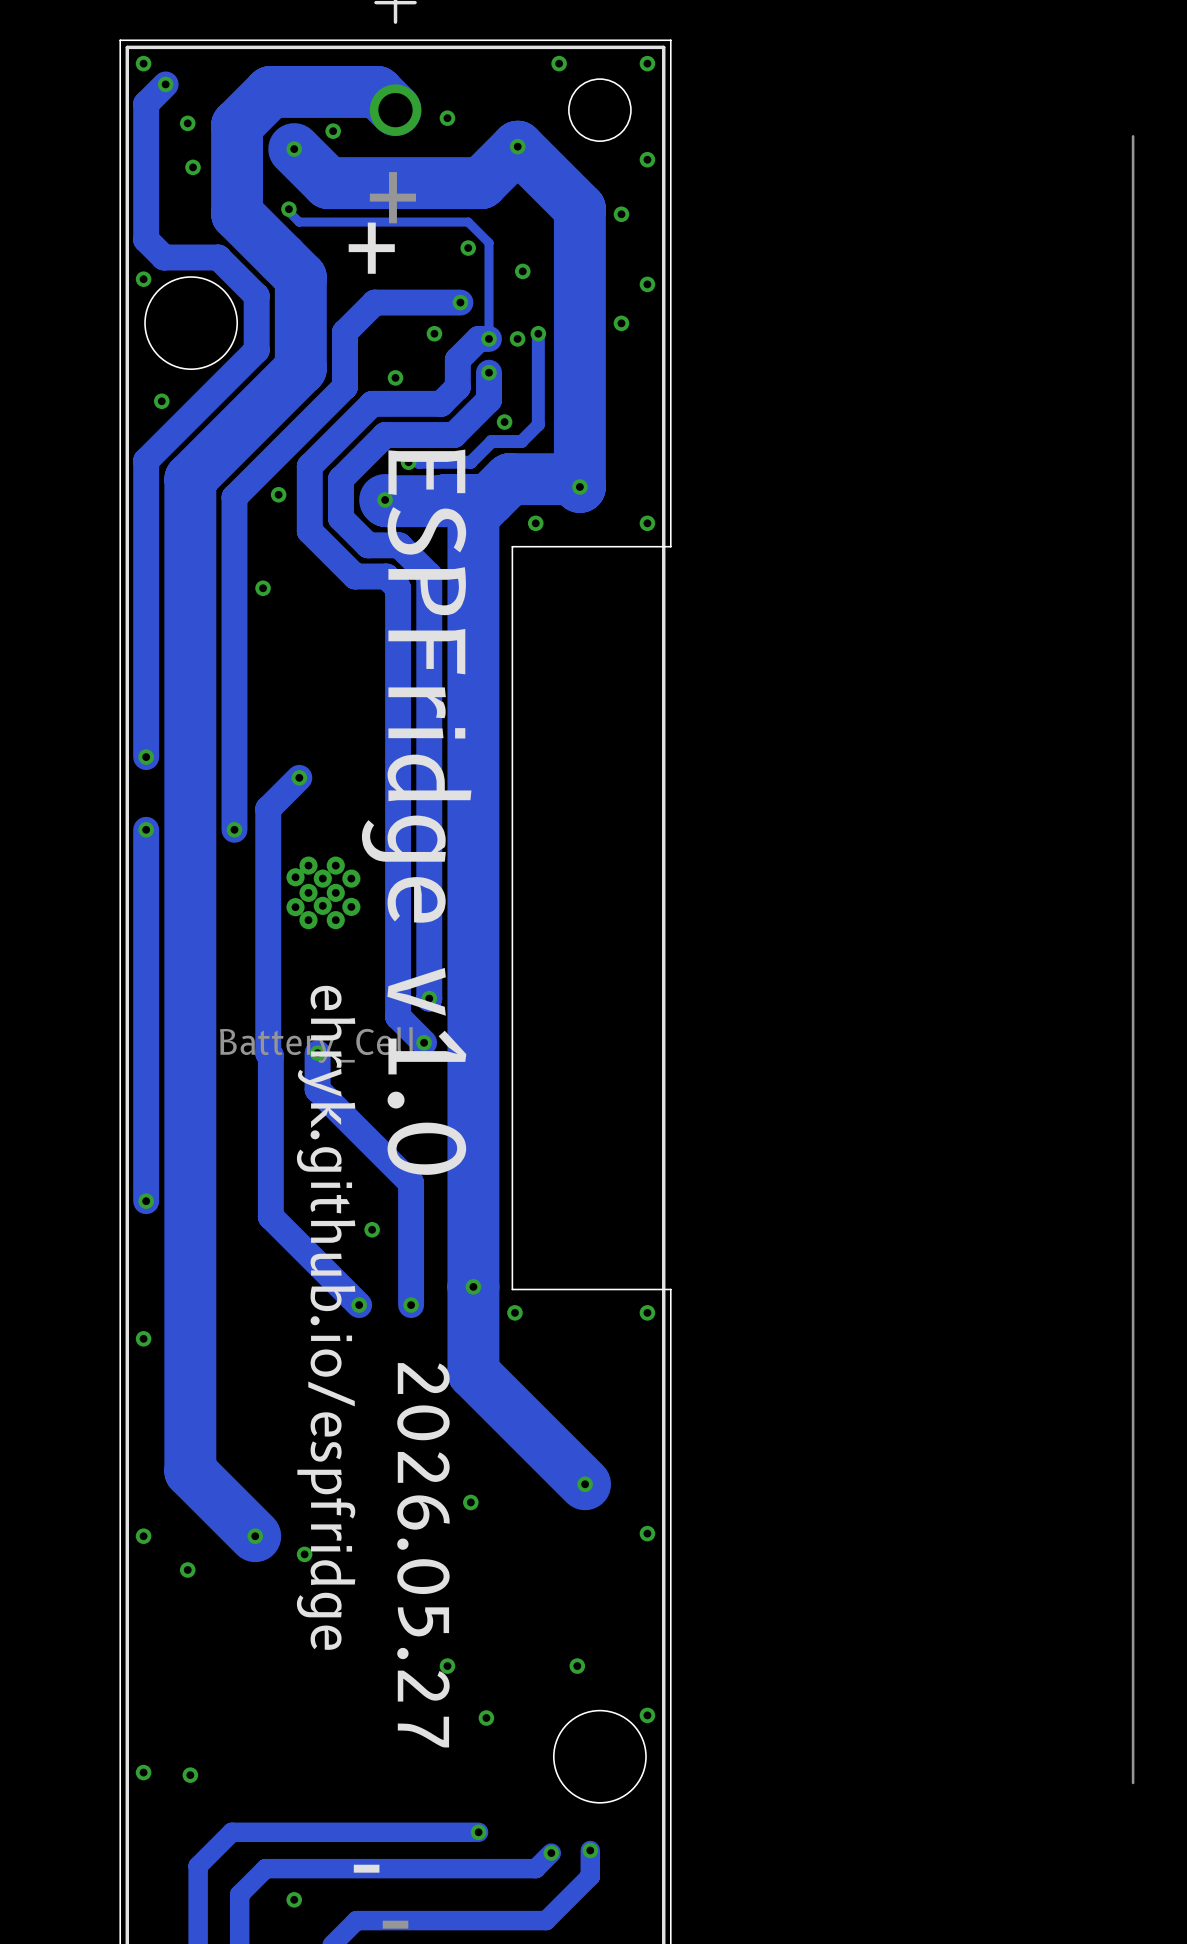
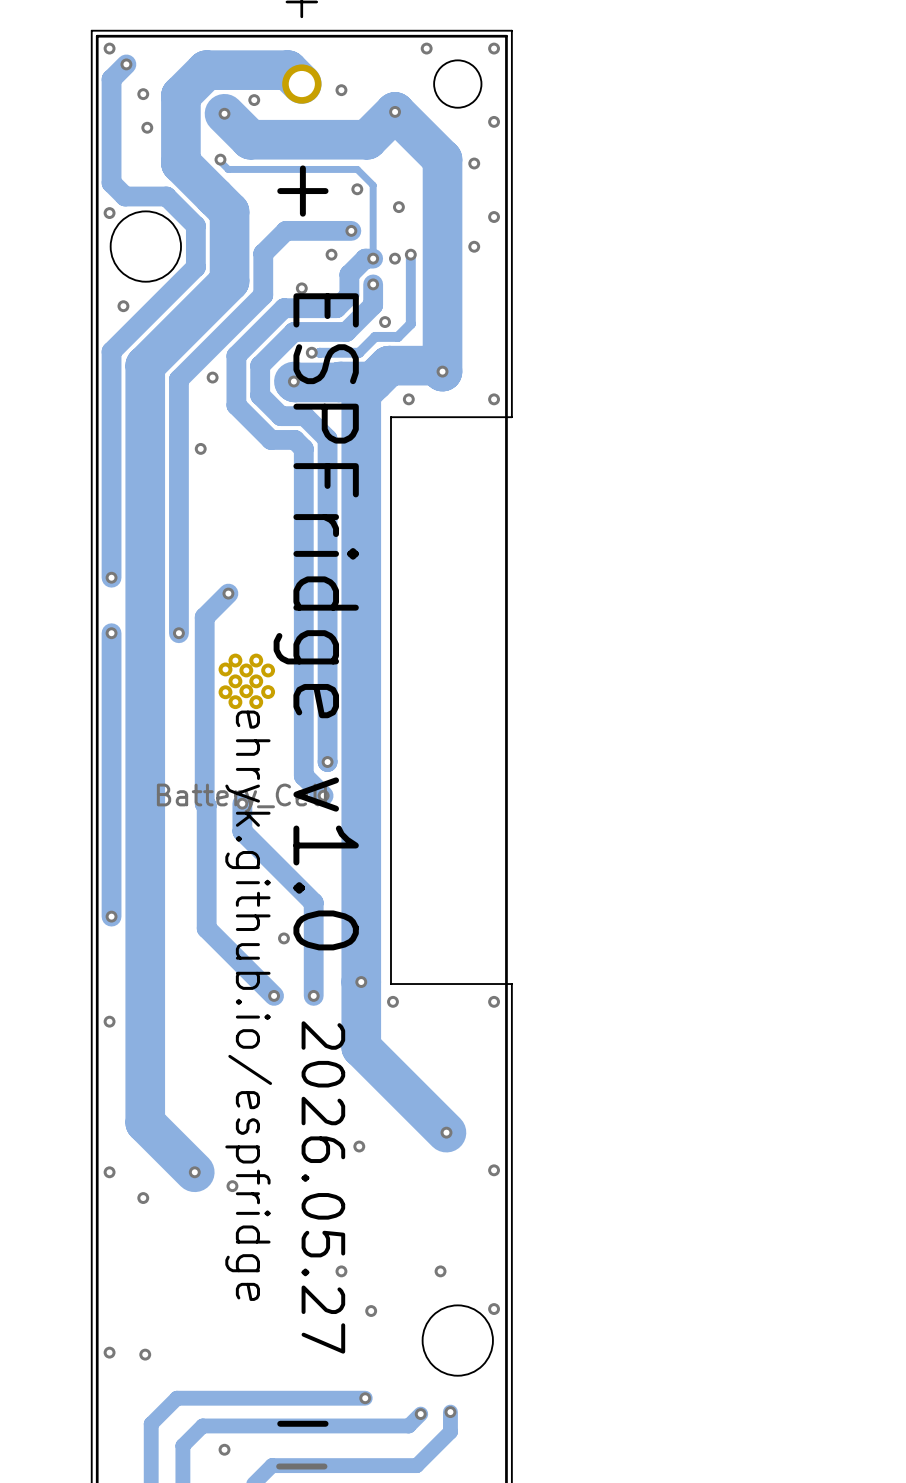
line: (1133, 136) (1133, 1782) -> none
text: + (392, 197) -> none

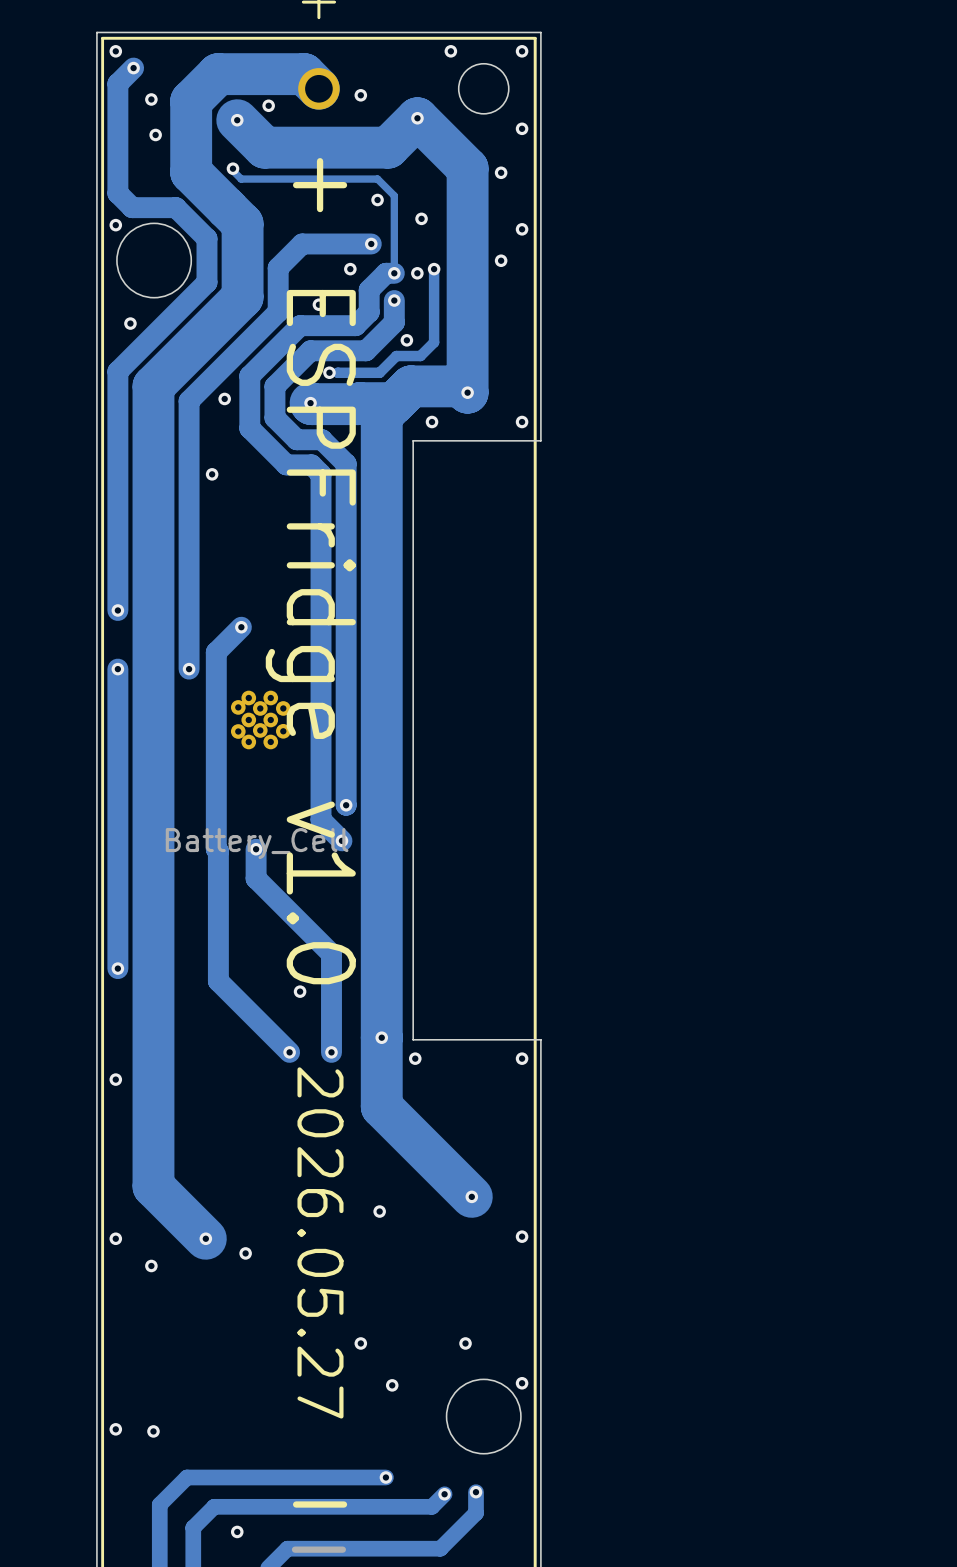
text position: + (302, 191) -> + (320, 185)
text position: ESPFridge v1.0 (316, 621) -> ESPFridge v1.0 (310, 637)
text: ehryk.github.io/espfridge (248, 1005) -> none
text position: 2026.05.27 (323, 1187) -> 2026.05.27 (320, 1242)

